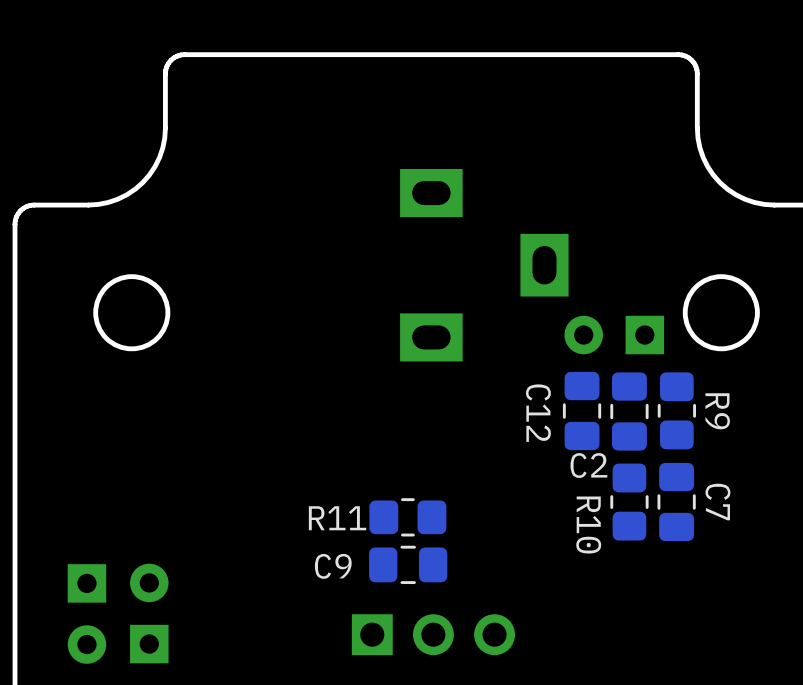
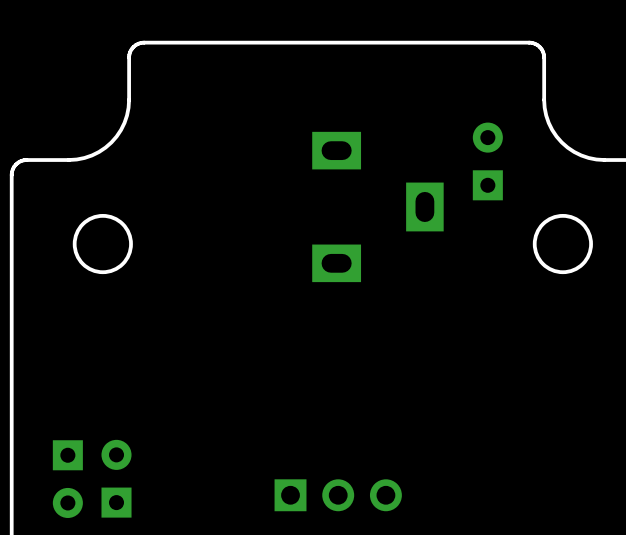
part rotation: 0° (614, 335) -> 90° clockwise (487, 161)
part position: (614, 335) -> (487, 161)
R9: (676, 410) -> none
C12: (582, 411) -> none
C2: (629, 411) -> none
R10: (629, 502) -> none
C7: (676, 502) -> none
R11: (407, 517) -> none
C9: (408, 564) -> none

